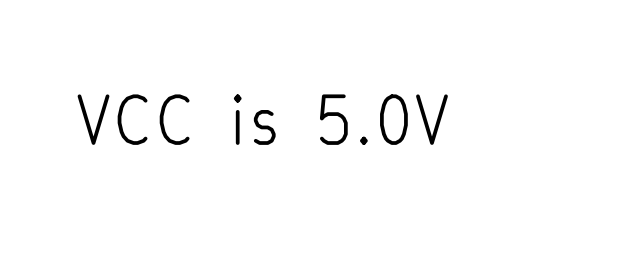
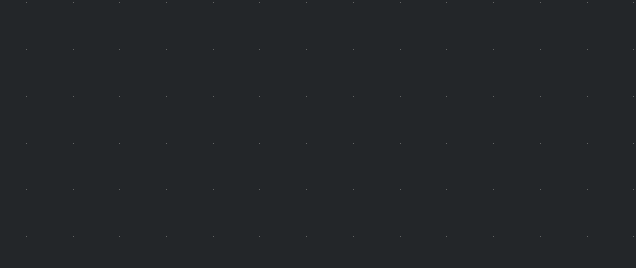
text: VCC is 5.0V (262, 119) -> none

